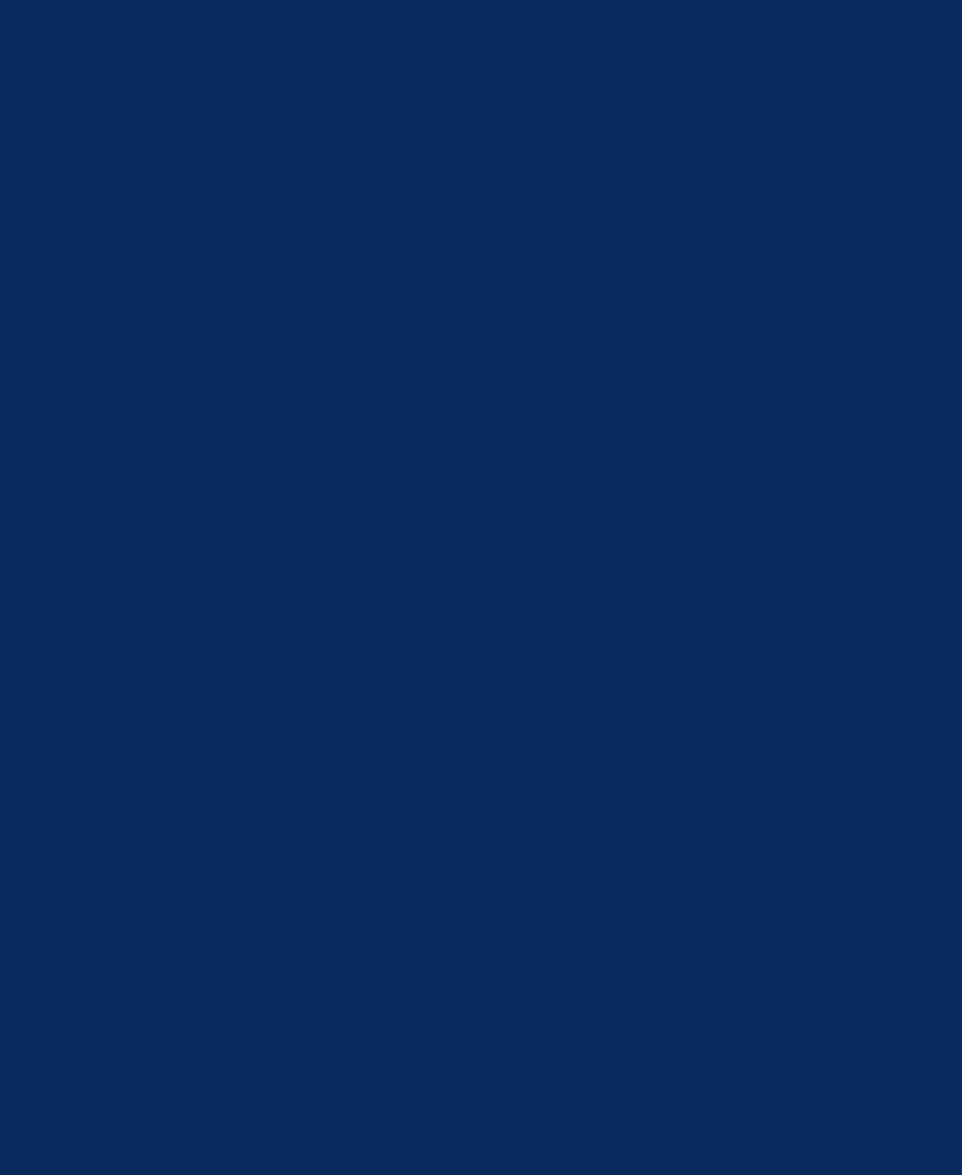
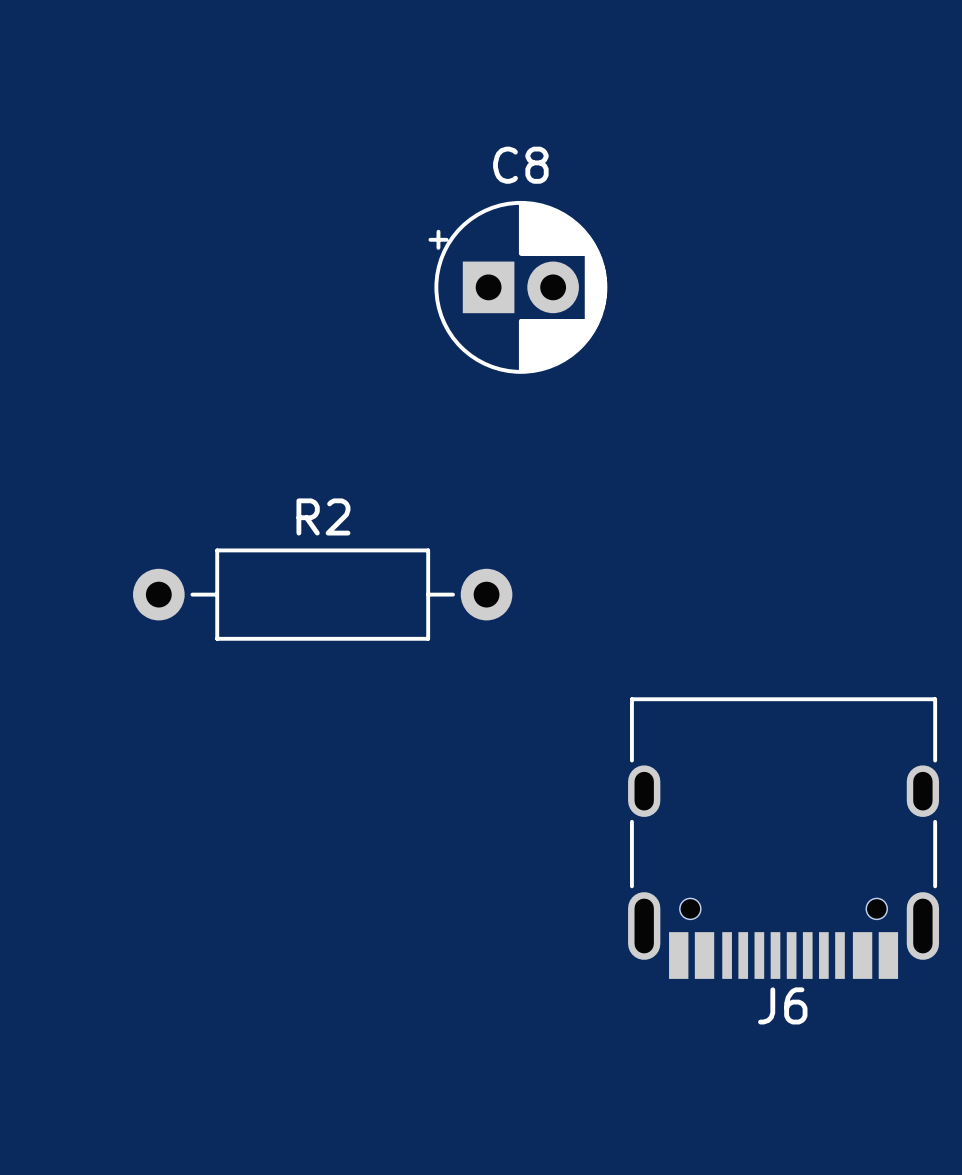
C8: none -> (517, 287)
R2: none -> (322, 594)
J6: none -> (783, 838)

